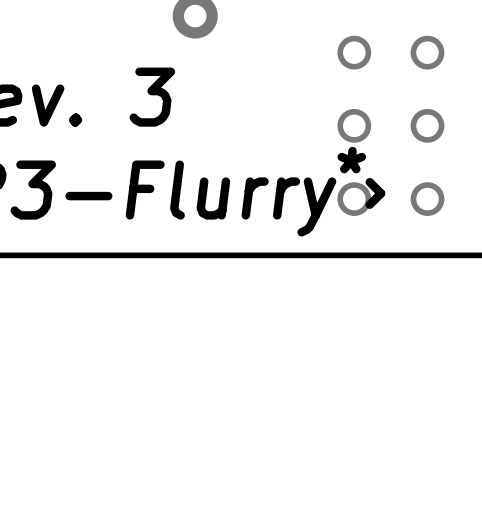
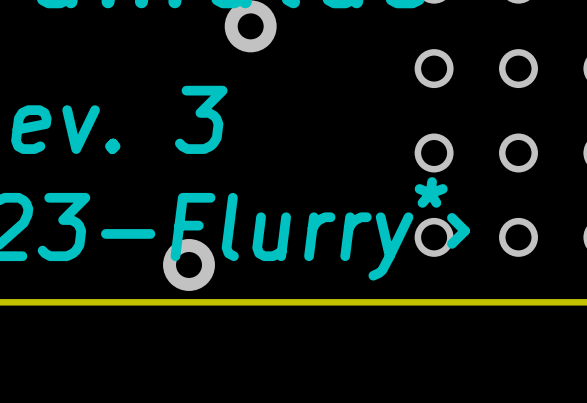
via: none -> (189, 264)

